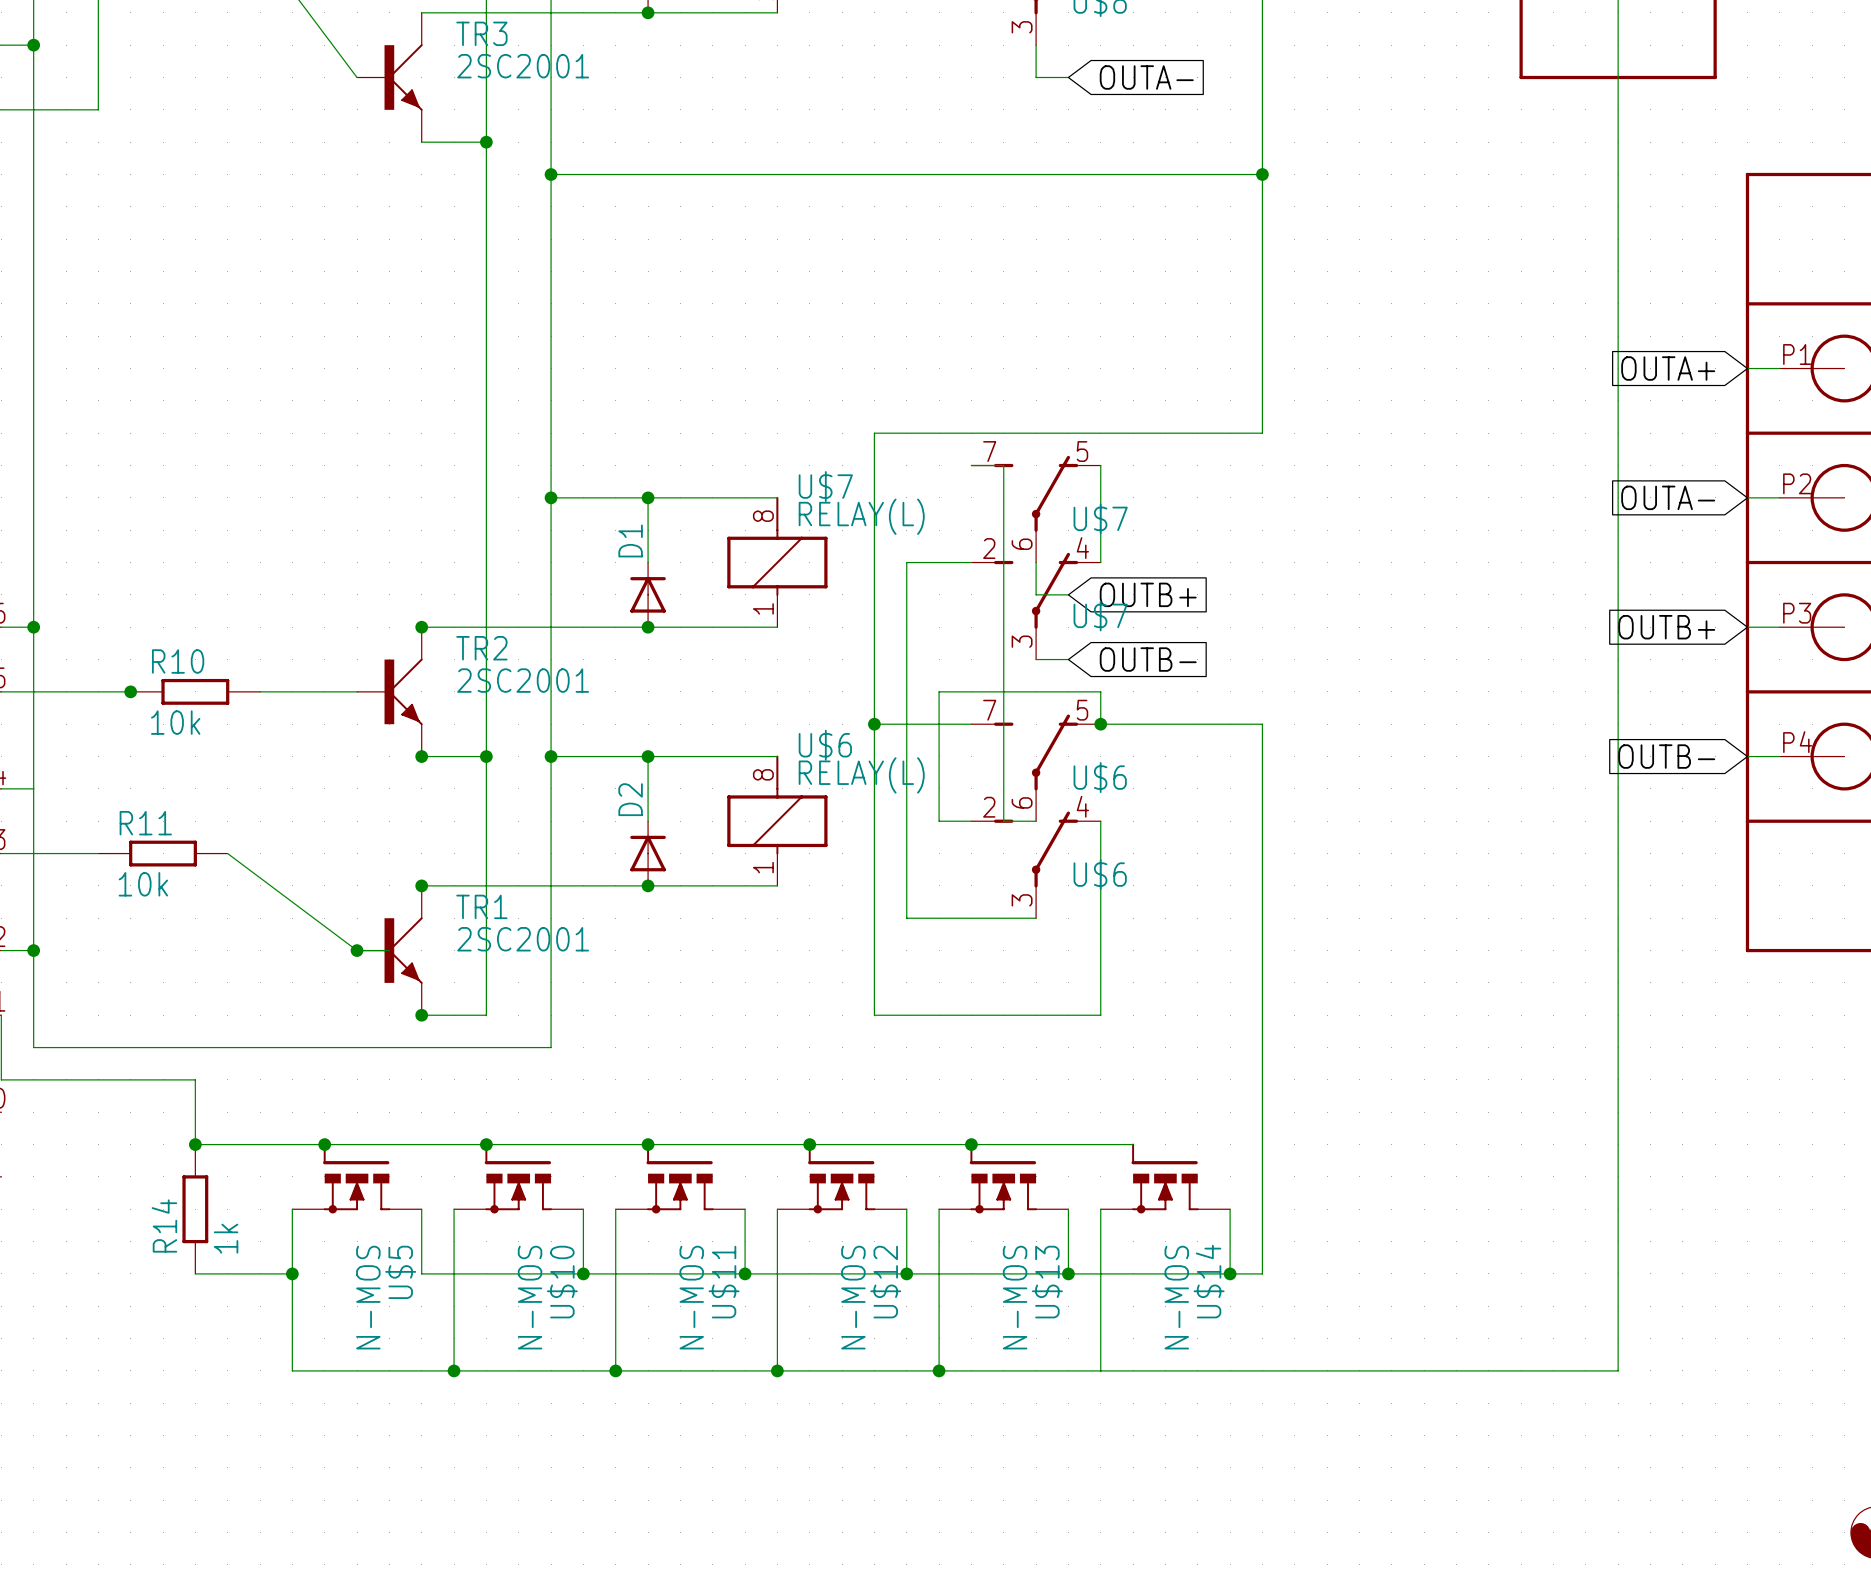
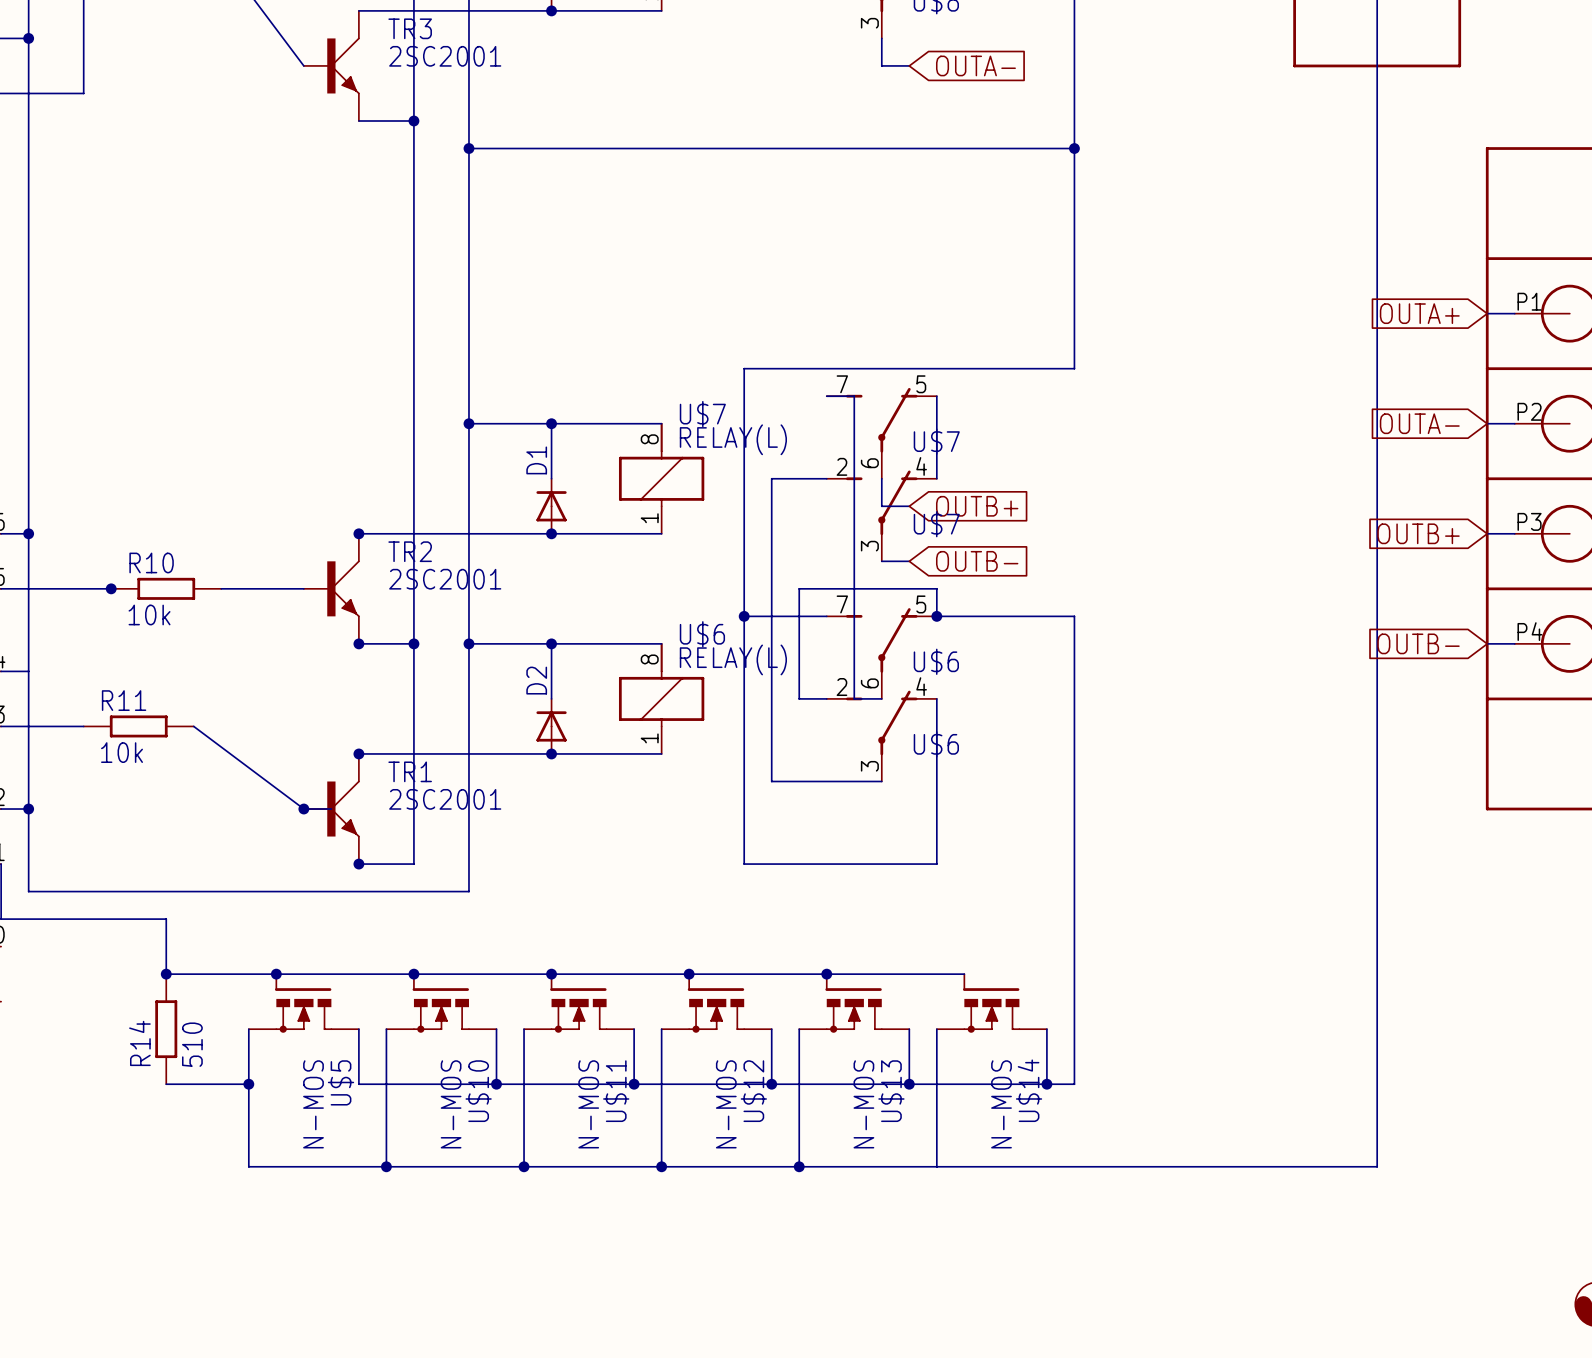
R14 value: 1k (226, 1238) -> 510 (192, 1044)

